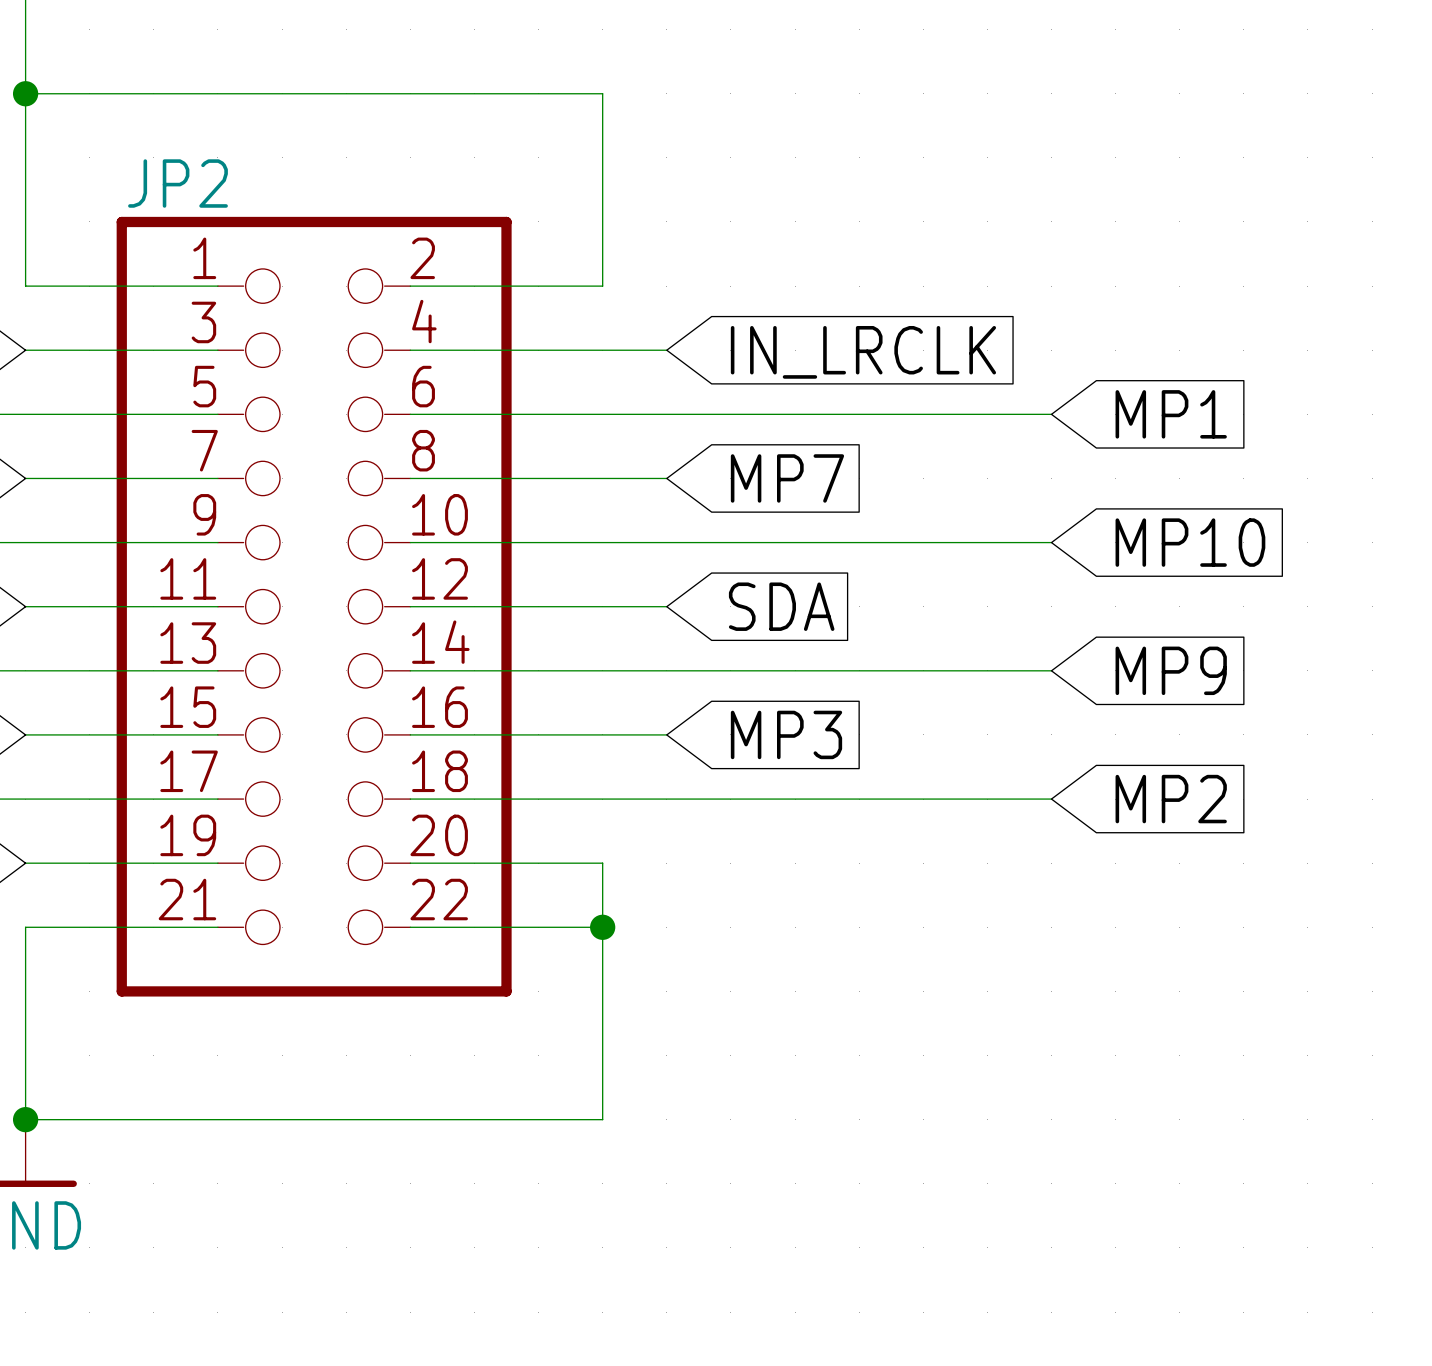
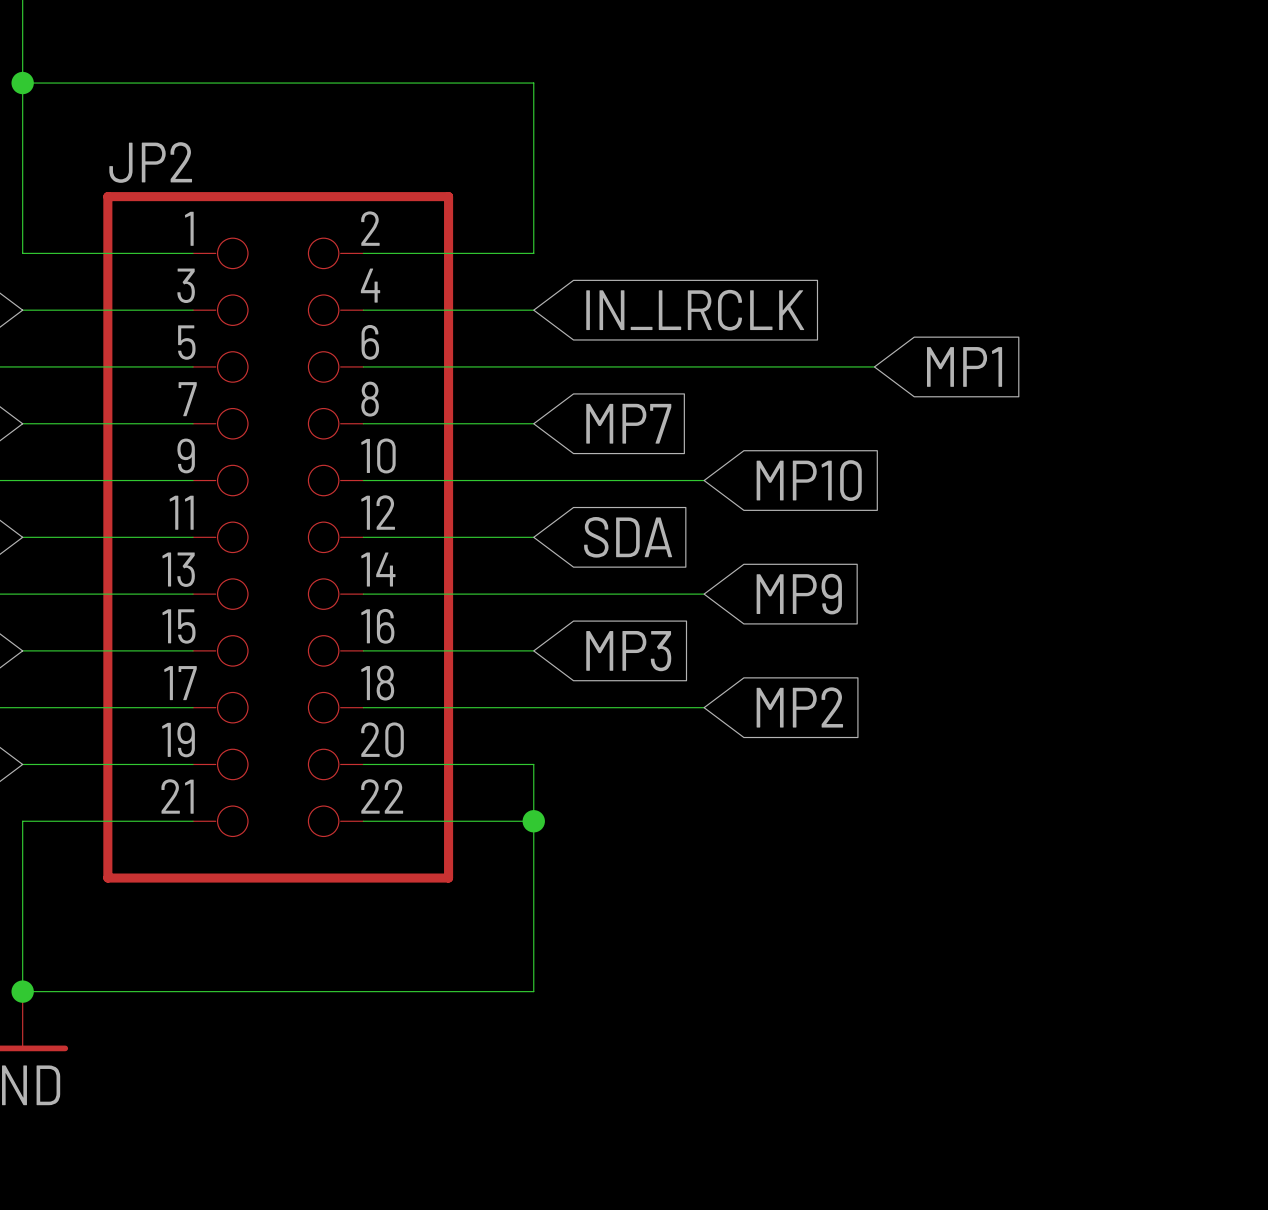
wire: (602, 350) (666, 350) -> none
global label position: IN_LRCLK (863, 352) -> IN_LRCLK (695, 310)
wire: (987, 414) (1051, 414) -> none
global label position: MP1 (1171, 414) -> MP1 (964, 366)
wire: (602, 478) (666, 478) -> none
global label position: MP7 (787, 478) -> MP7 (628, 423)
wire: (795, 542) (1051, 542) -> none
global label position: MP10 (1190, 542) -> MP10 (809, 480)
wire: (602, 606) (666, 606) -> none
global label position: SDA (781, 606) -> SDA (628, 537)
wire: (795, 670) (1051, 670) -> none
global label position: MP9 (1171, 670) -> MP9 (799, 594)
wire: (602, 734) (666, 734) -> none
global label position: MP3 (786, 734) -> MP3 (628, 651)
wire: (795, 799) (1051, 799) -> none
global label position: MP2 (1171, 799) -> MP2 (799, 707)

